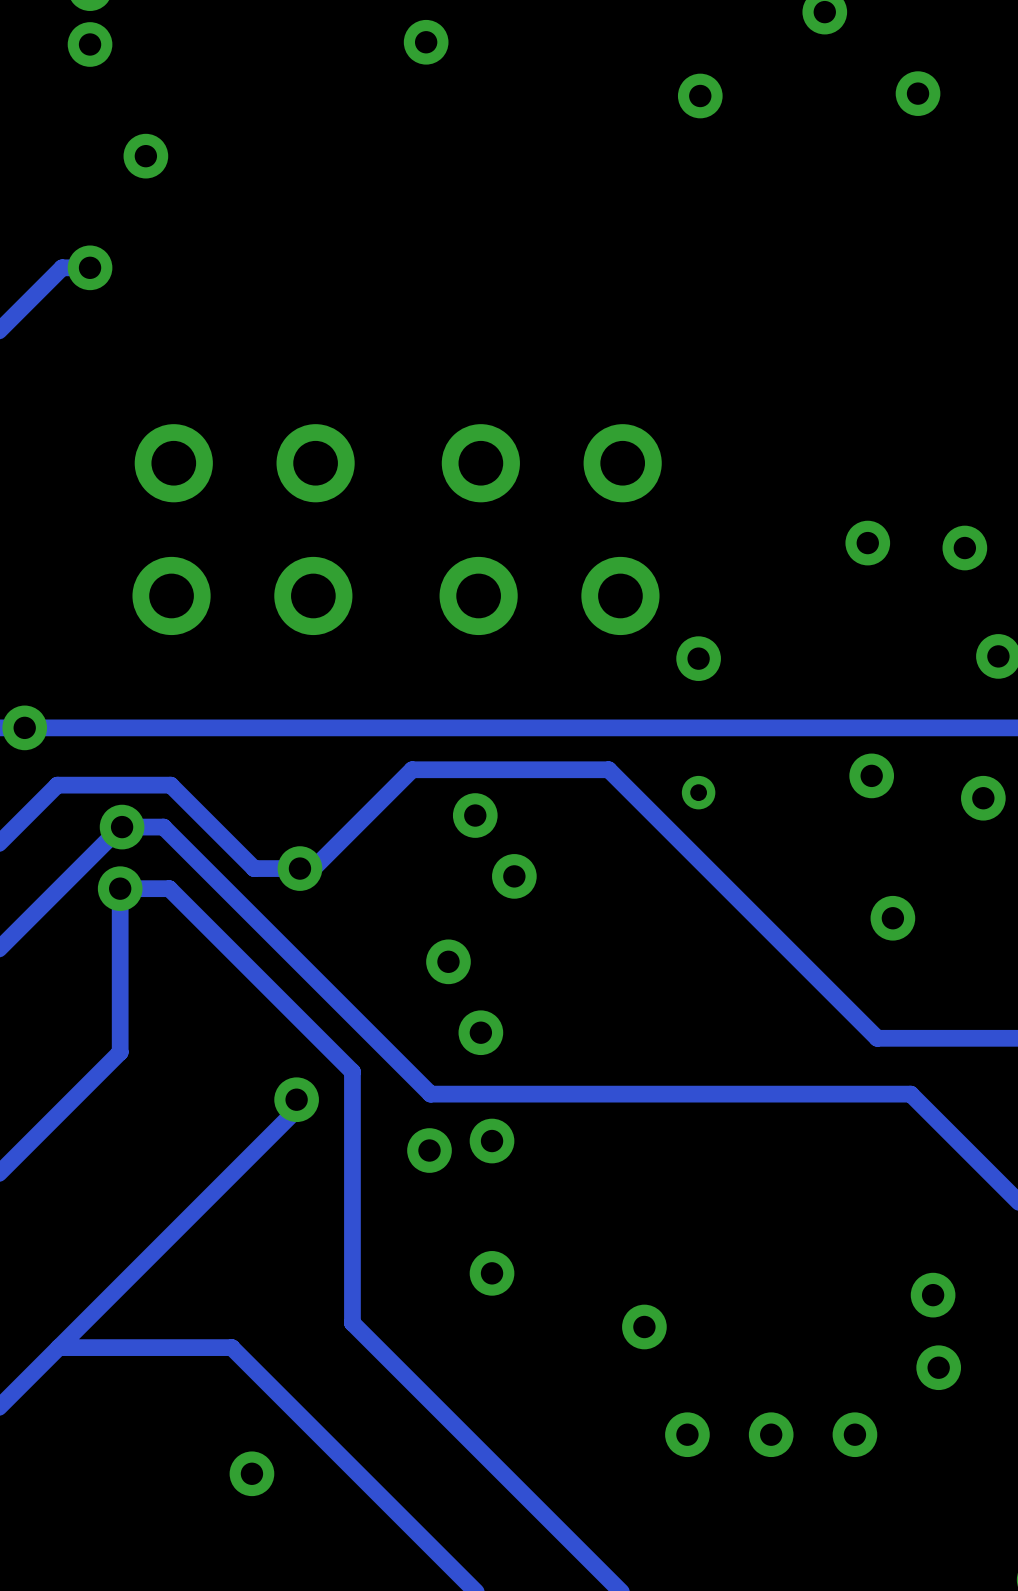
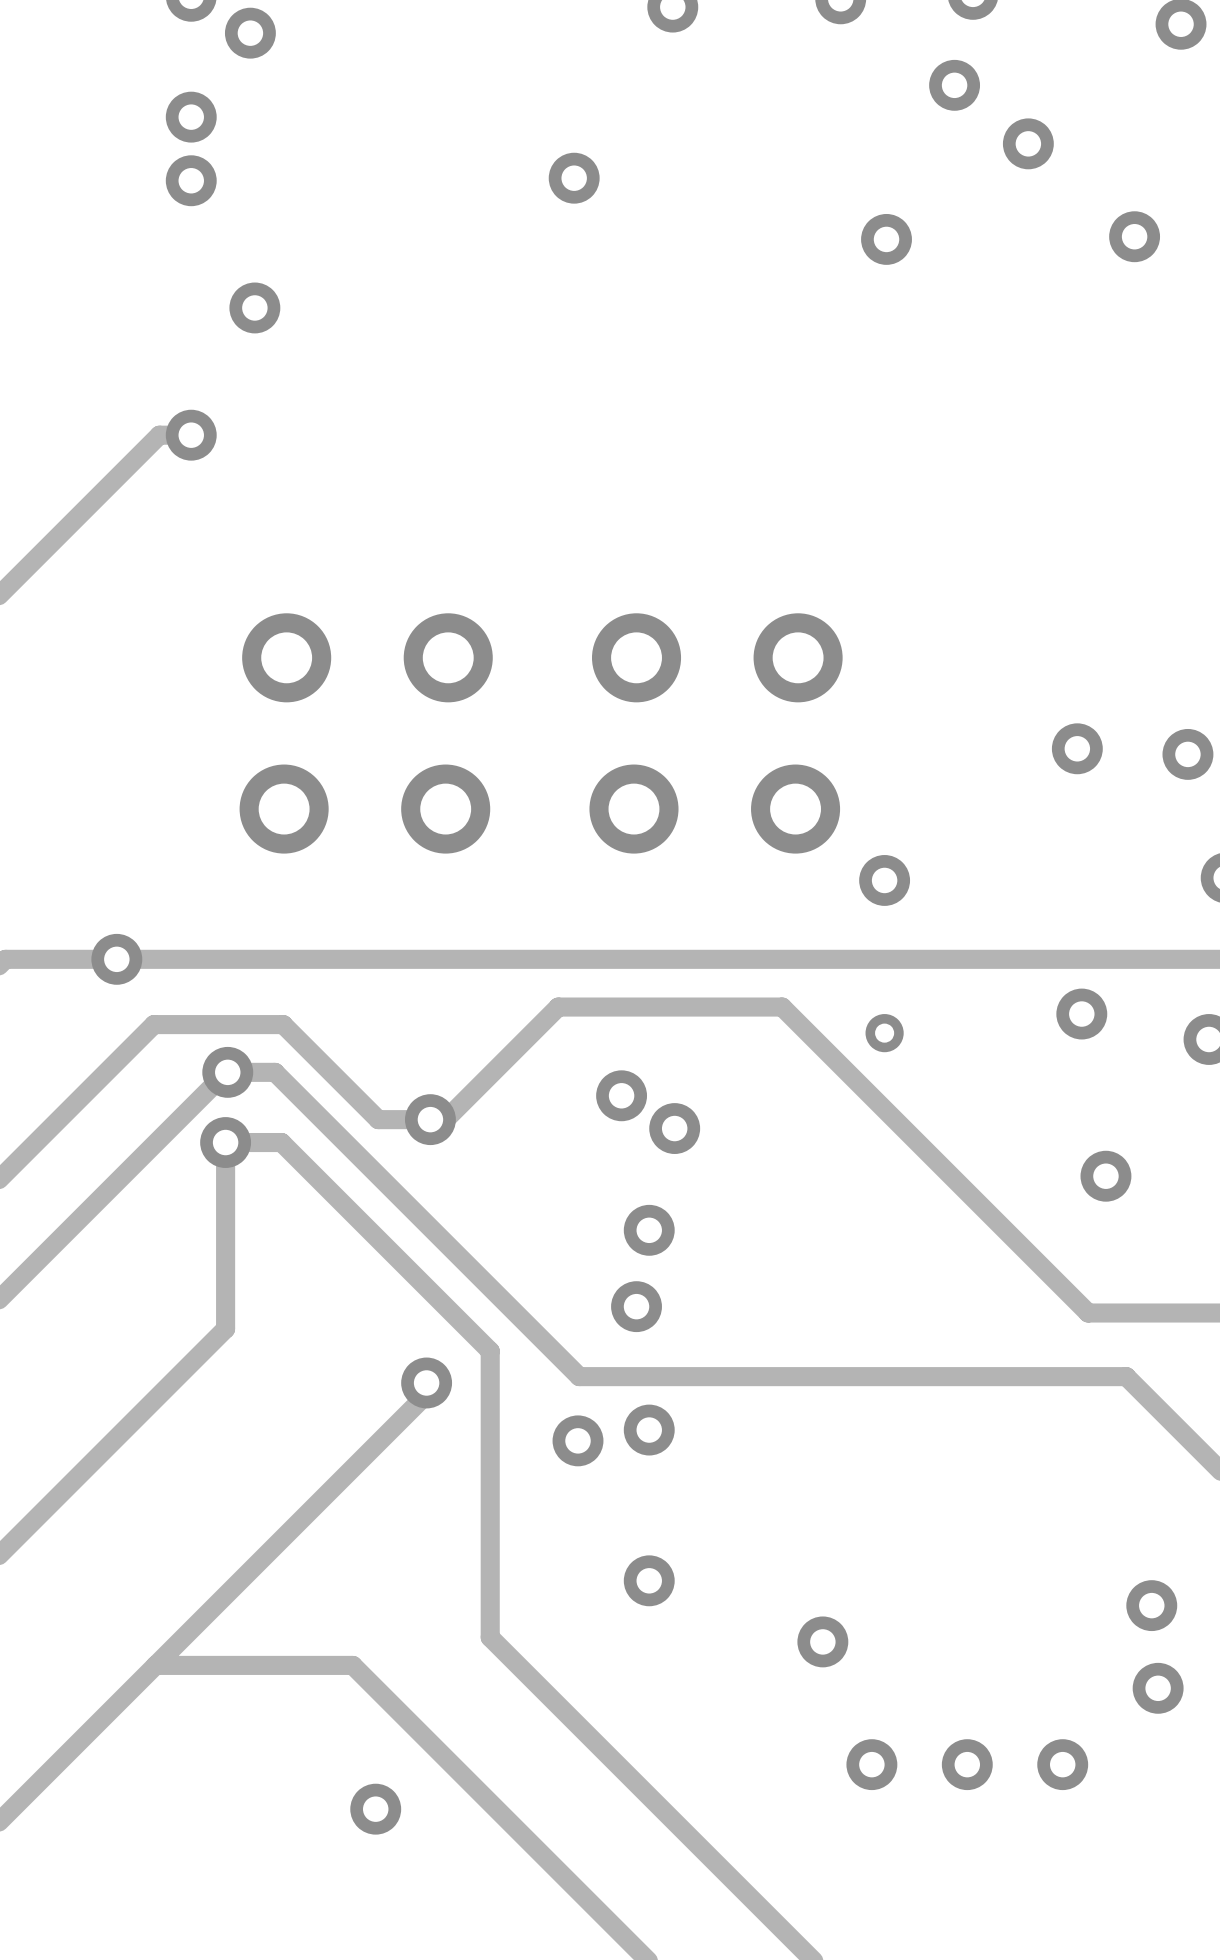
via position: (475, 815) -> (621, 1095)
via position: (448, 961) -> (649, 1230)

